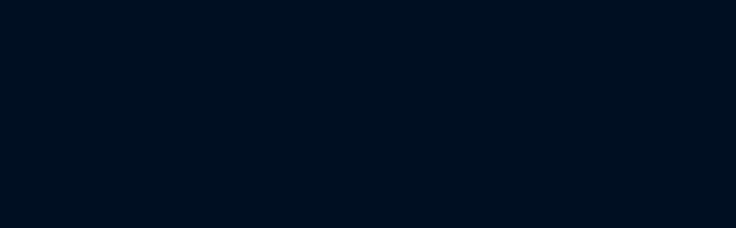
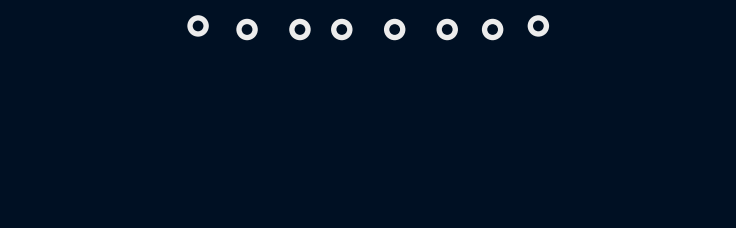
via: none -> (198, 25)
via: none -> (538, 25)
via: none -> (247, 29)
via: none -> (299, 29)
via: none -> (341, 29)
via: none -> (394, 29)
via: none -> (447, 29)
via: none -> (492, 29)

